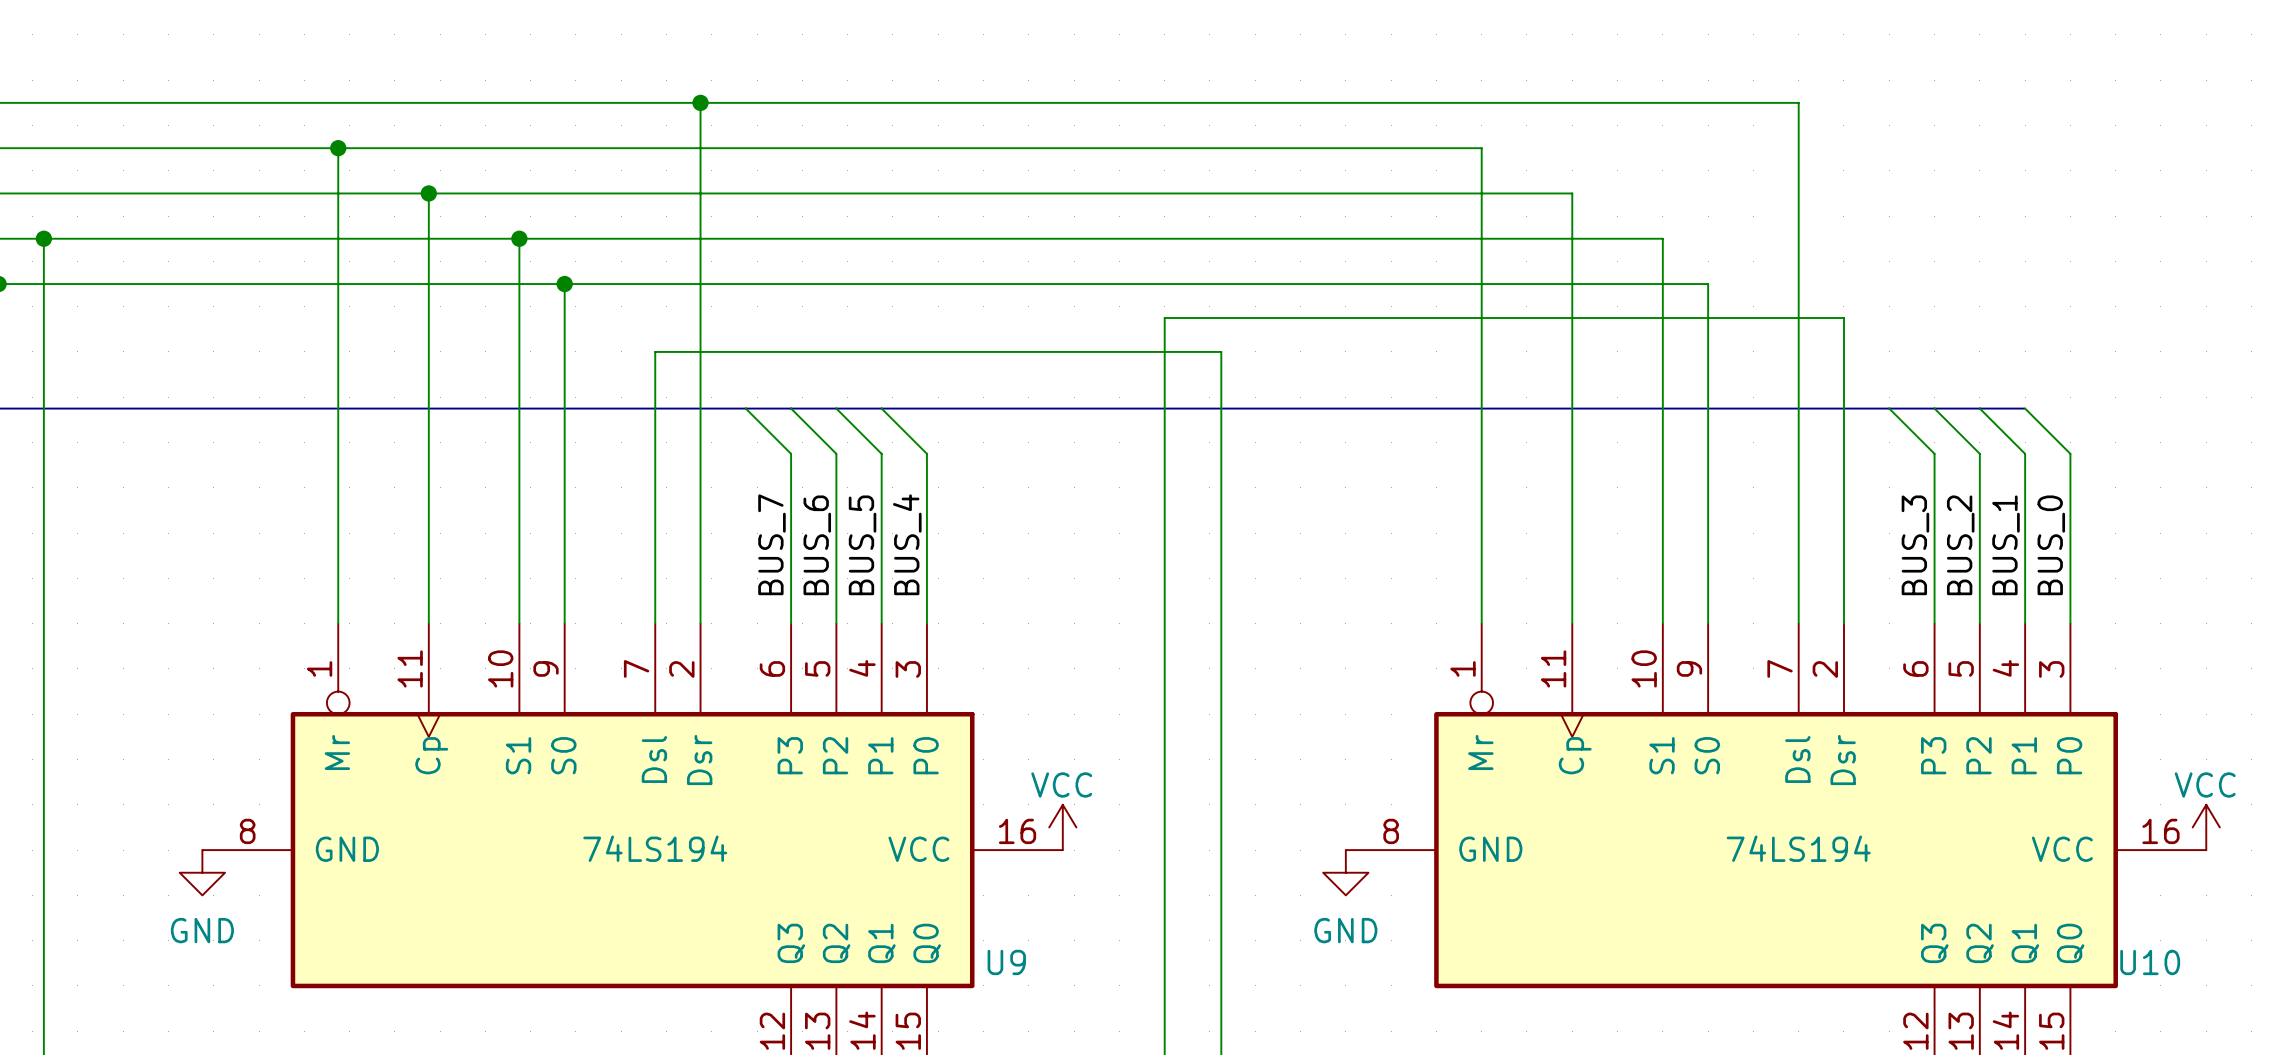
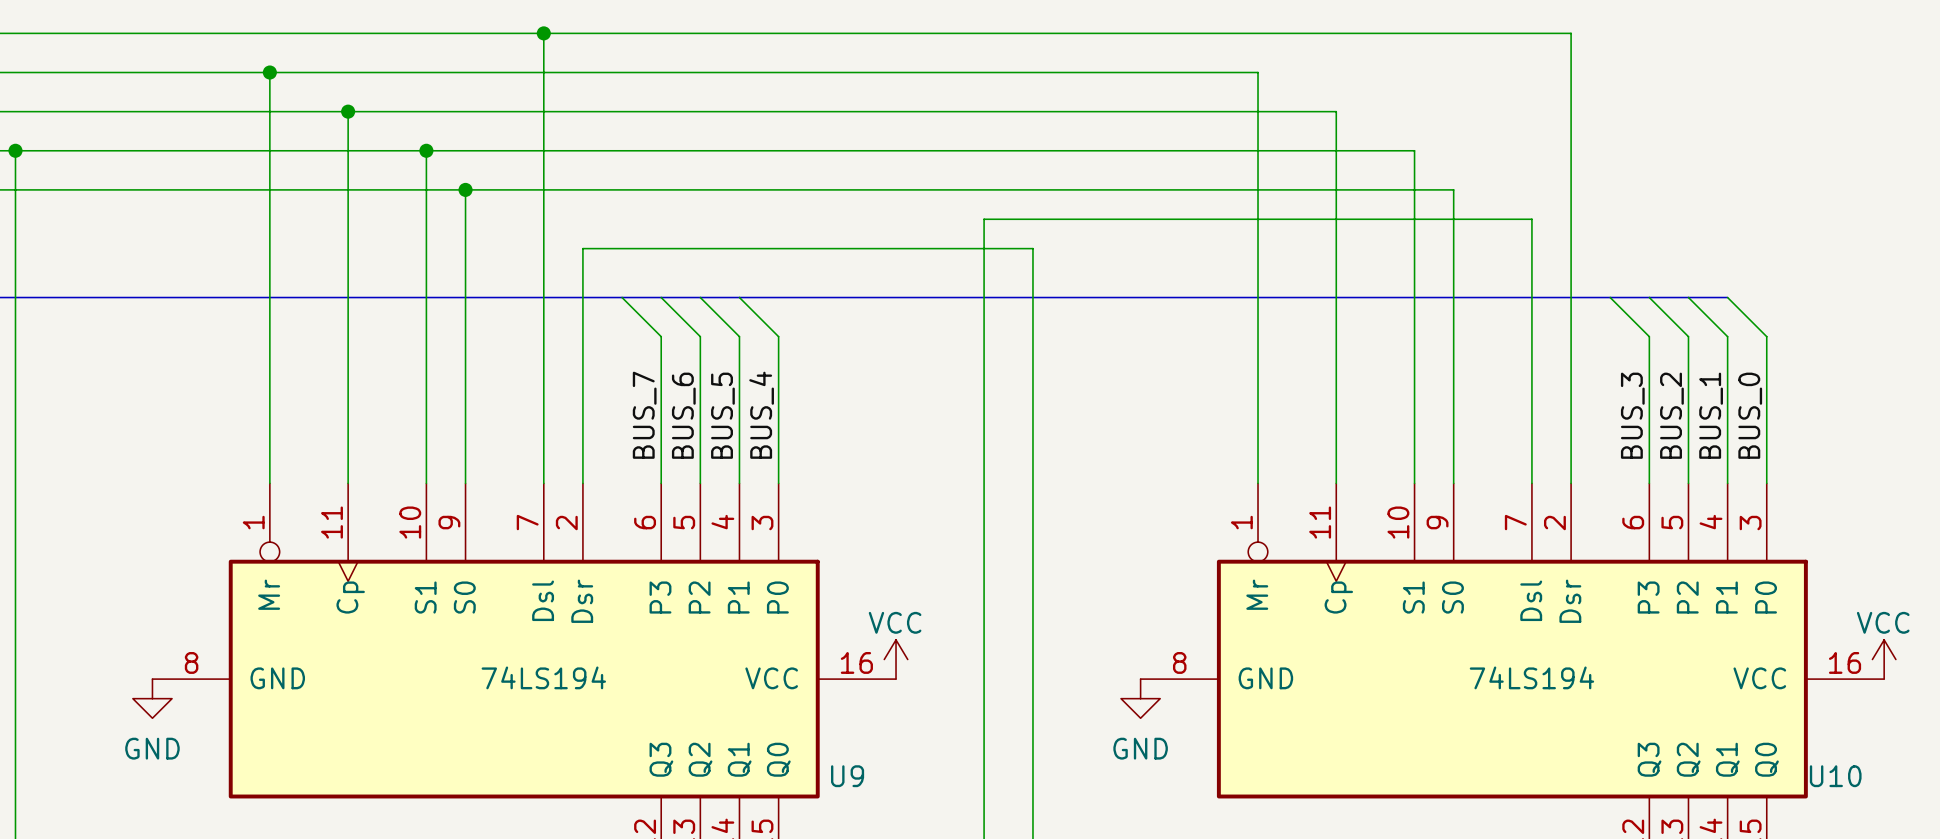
wire: (700, 102) (700, 351) (655, 351) -> (543, 33) (543, 248)
junction position: (700, 102) -> (543, 33)
wire: (1798, 102) (1798, 317) (1843, 317) -> (1531, 33) (1571, 33) (1571, 219)

